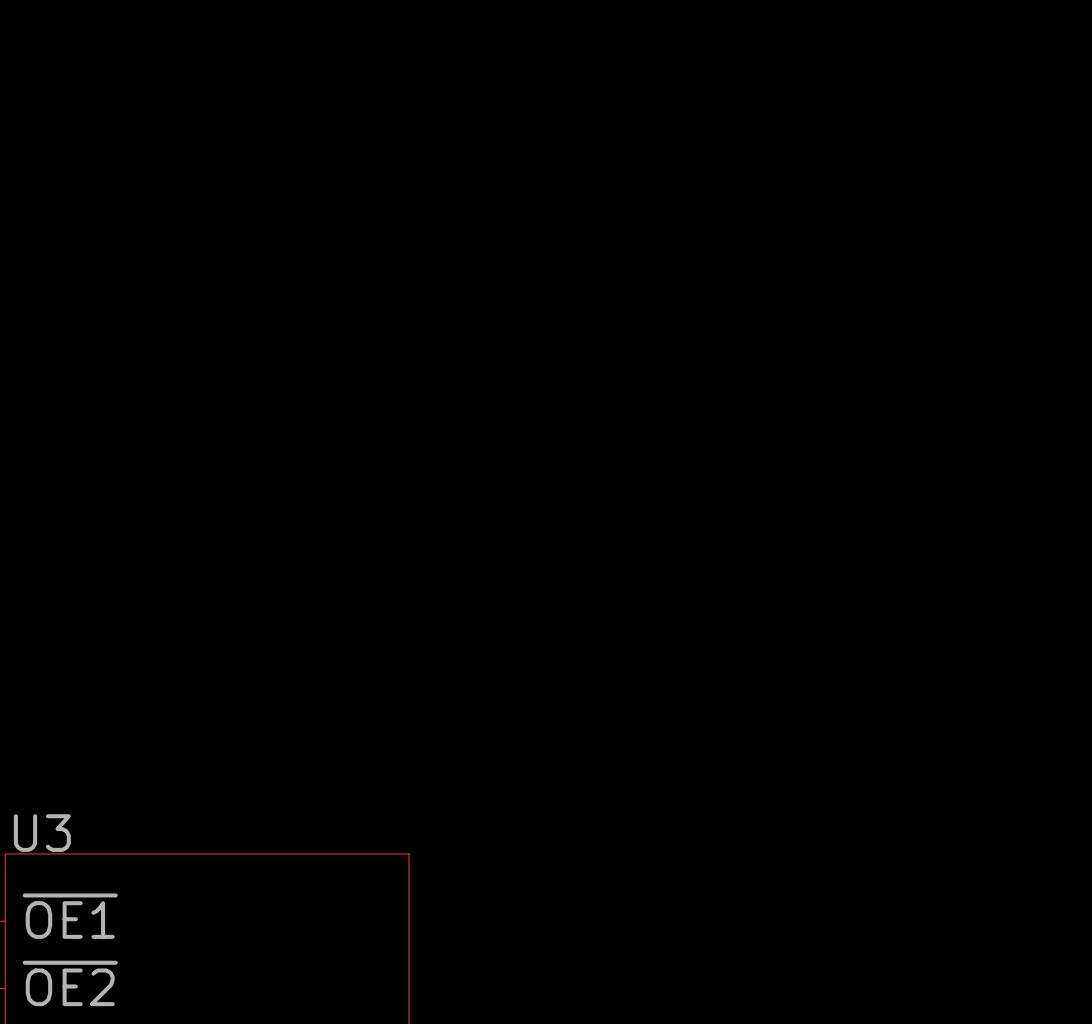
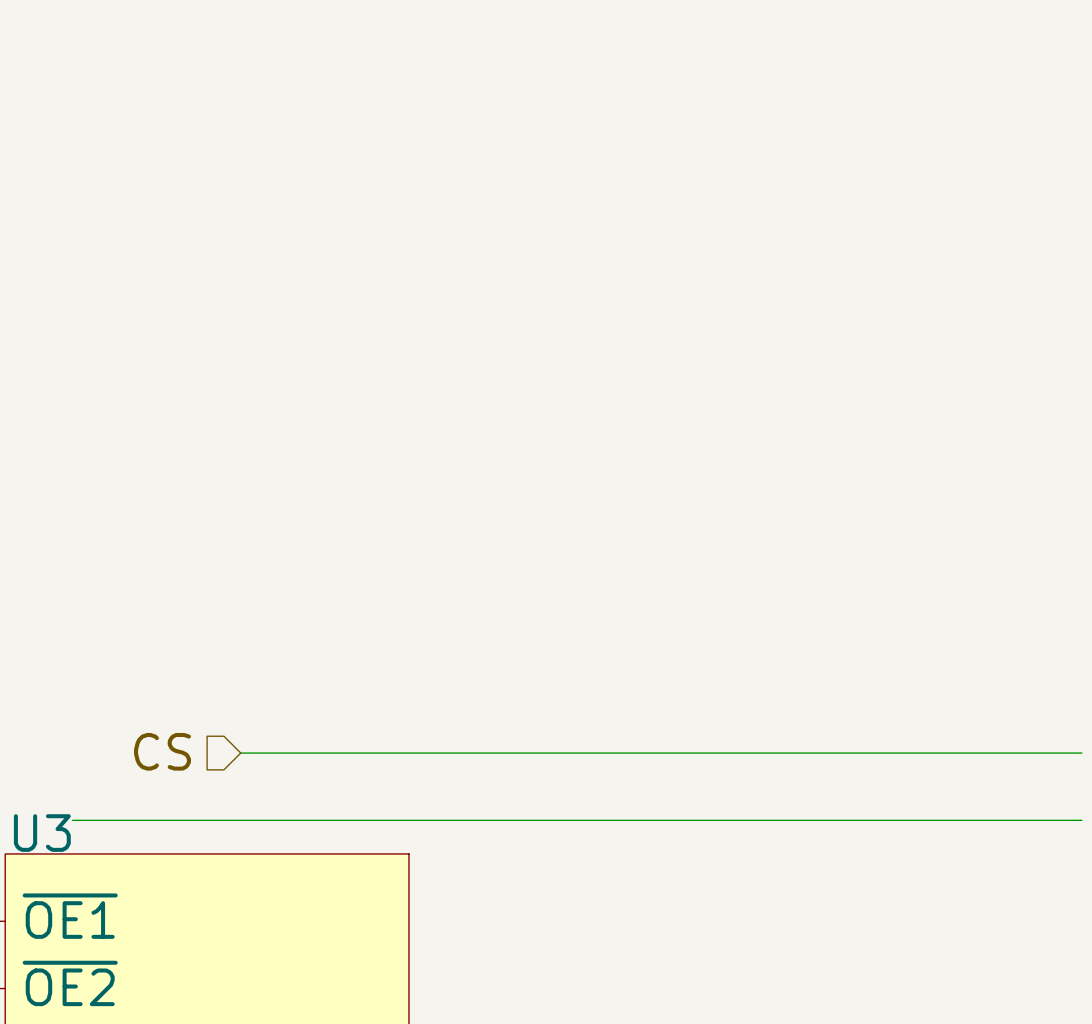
hierarchical label: none -> CS (162, 751)
wire: none -> (240, 753) (1081, 753)
wire: none -> (72, 820) (1081, 820)

